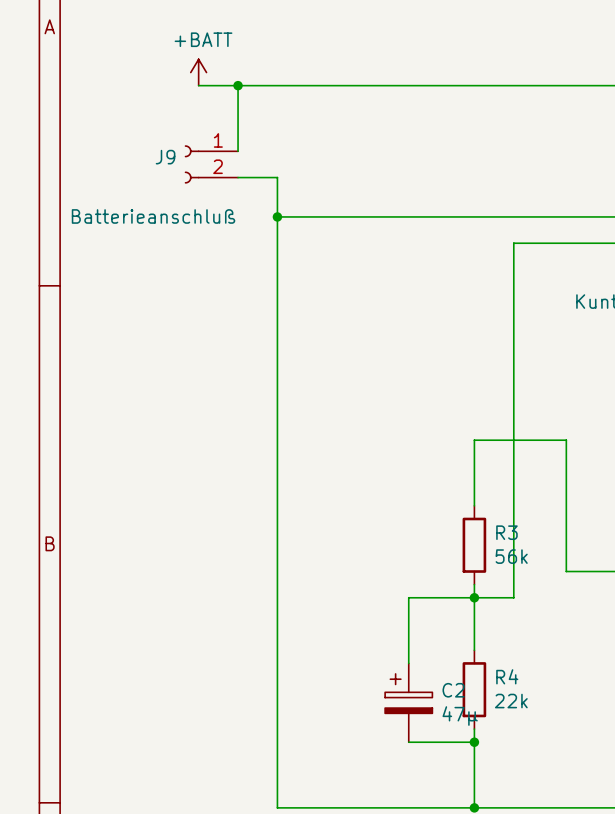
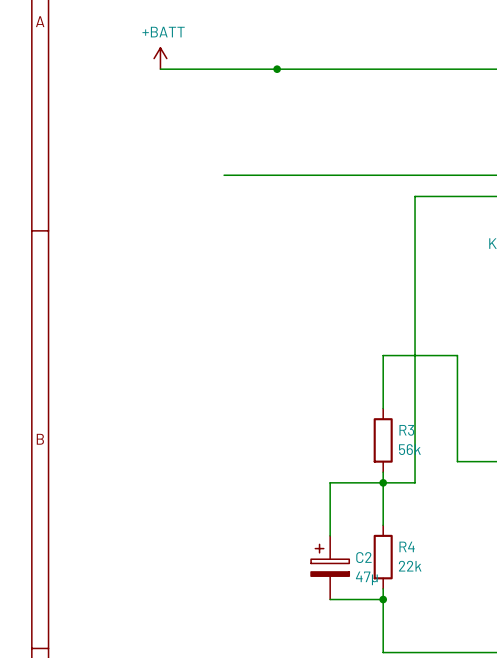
wire: (238, 85) (238, 151) -> none
junction: (238, 85) -> none
junction: none -> (277, 69)
J9: Batterieanschluß (211, 164) -> none
wire: (238, 177) (277, 177) (277, 807) (474, 807) -> none
junction: (277, 216) -> none
junction: (474, 807) -> none

